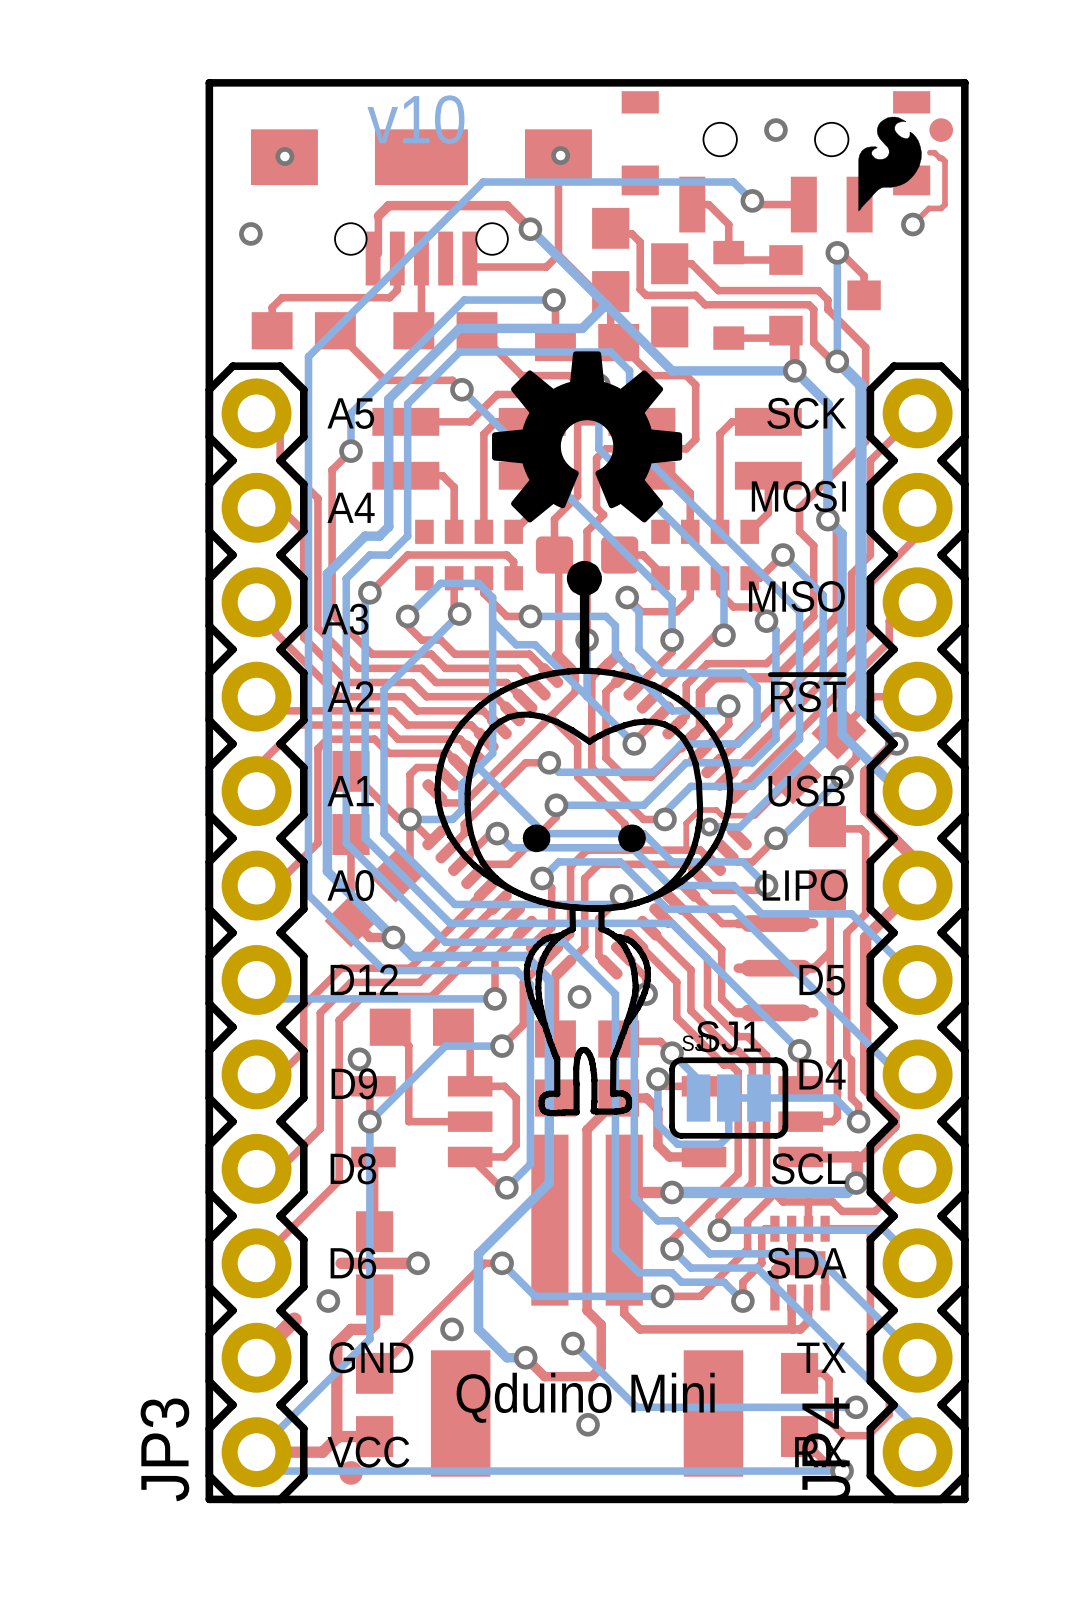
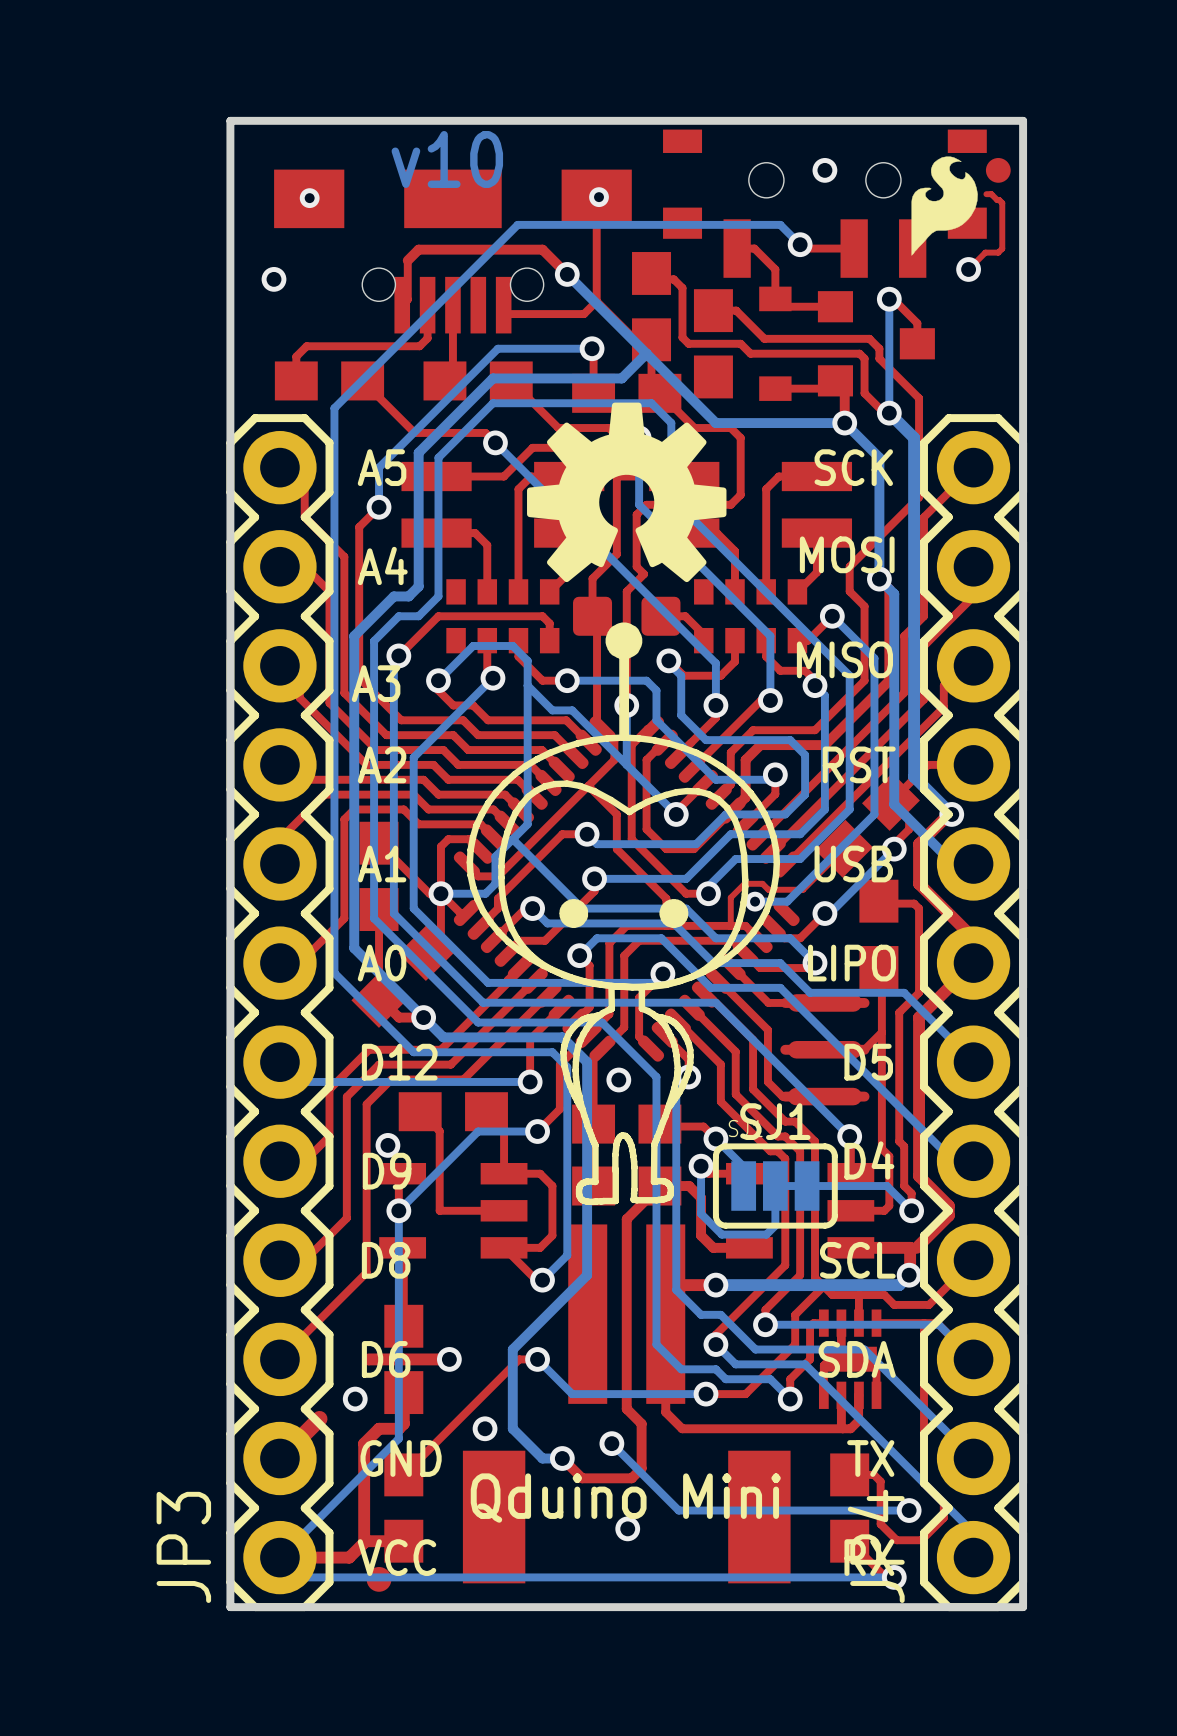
text: ~{RST} (808, 693) -> RST (859, 764)

